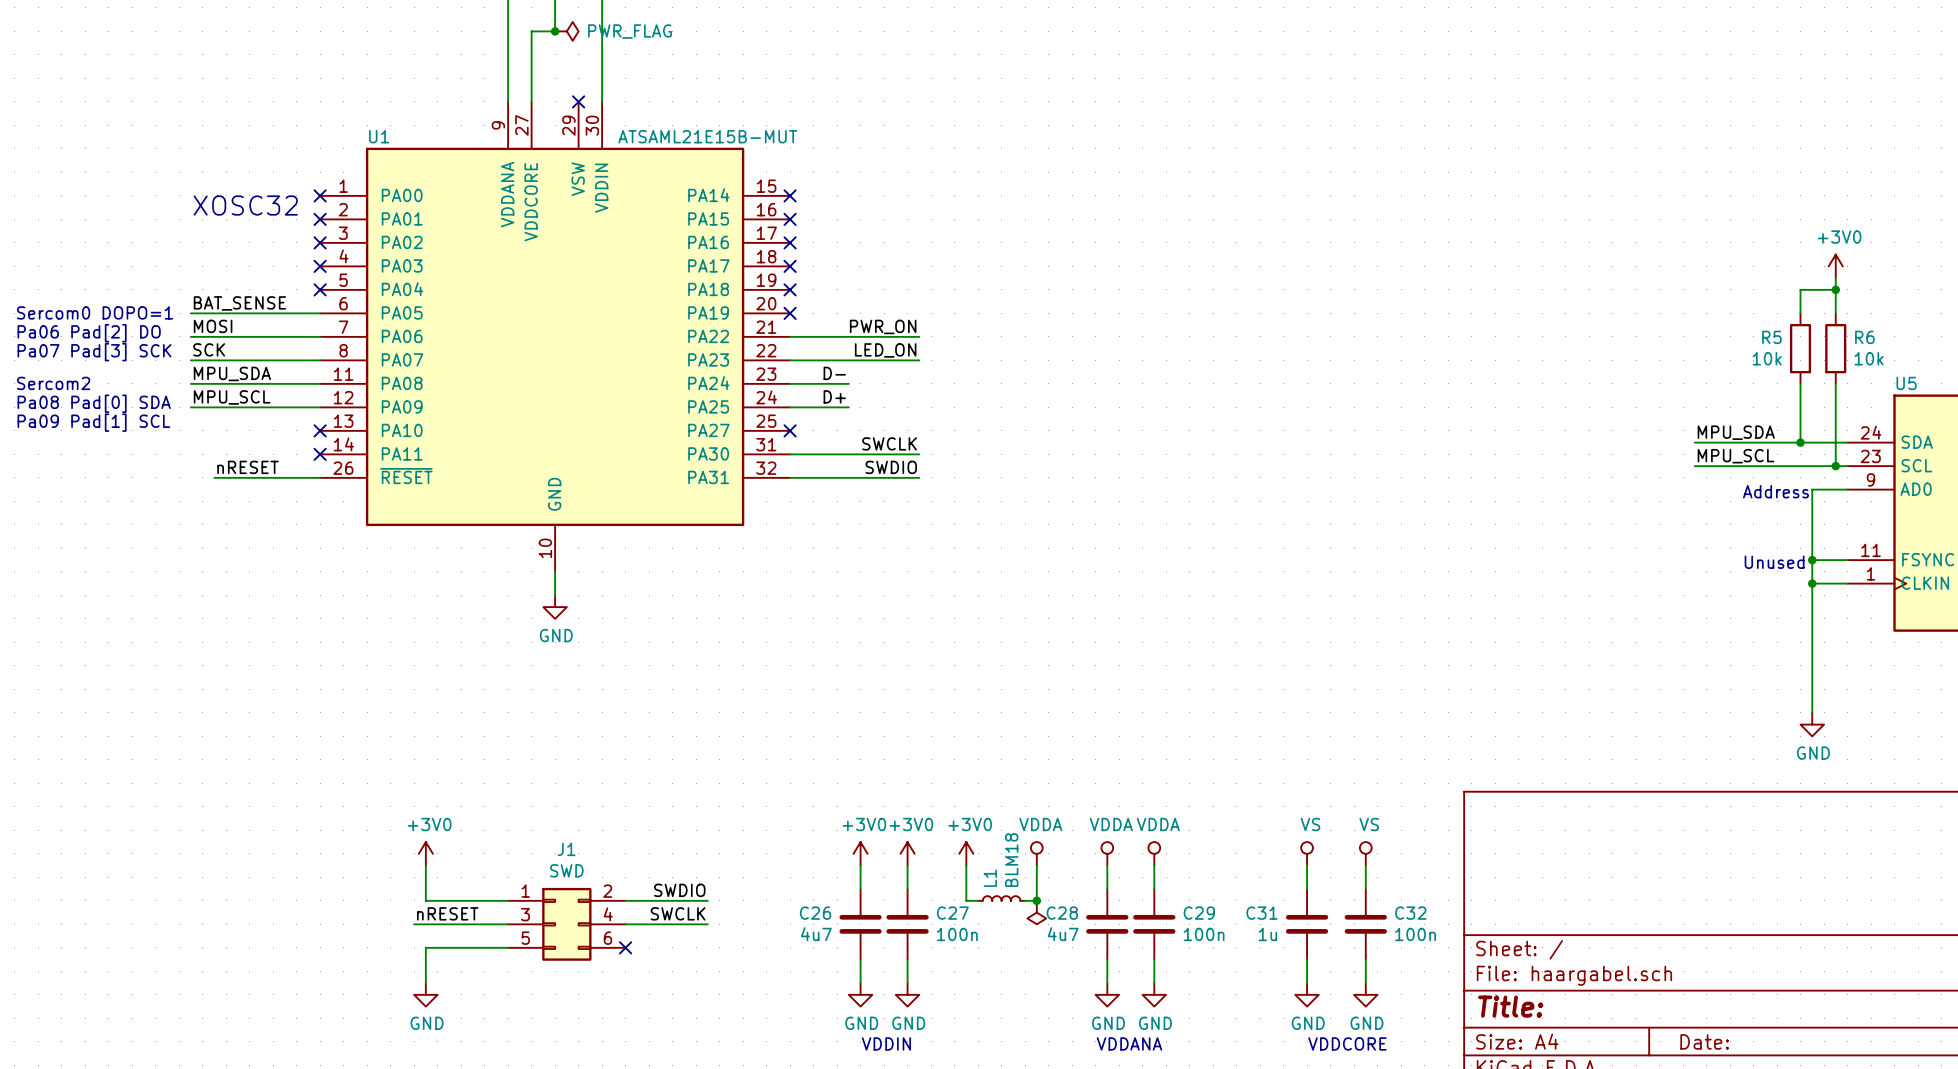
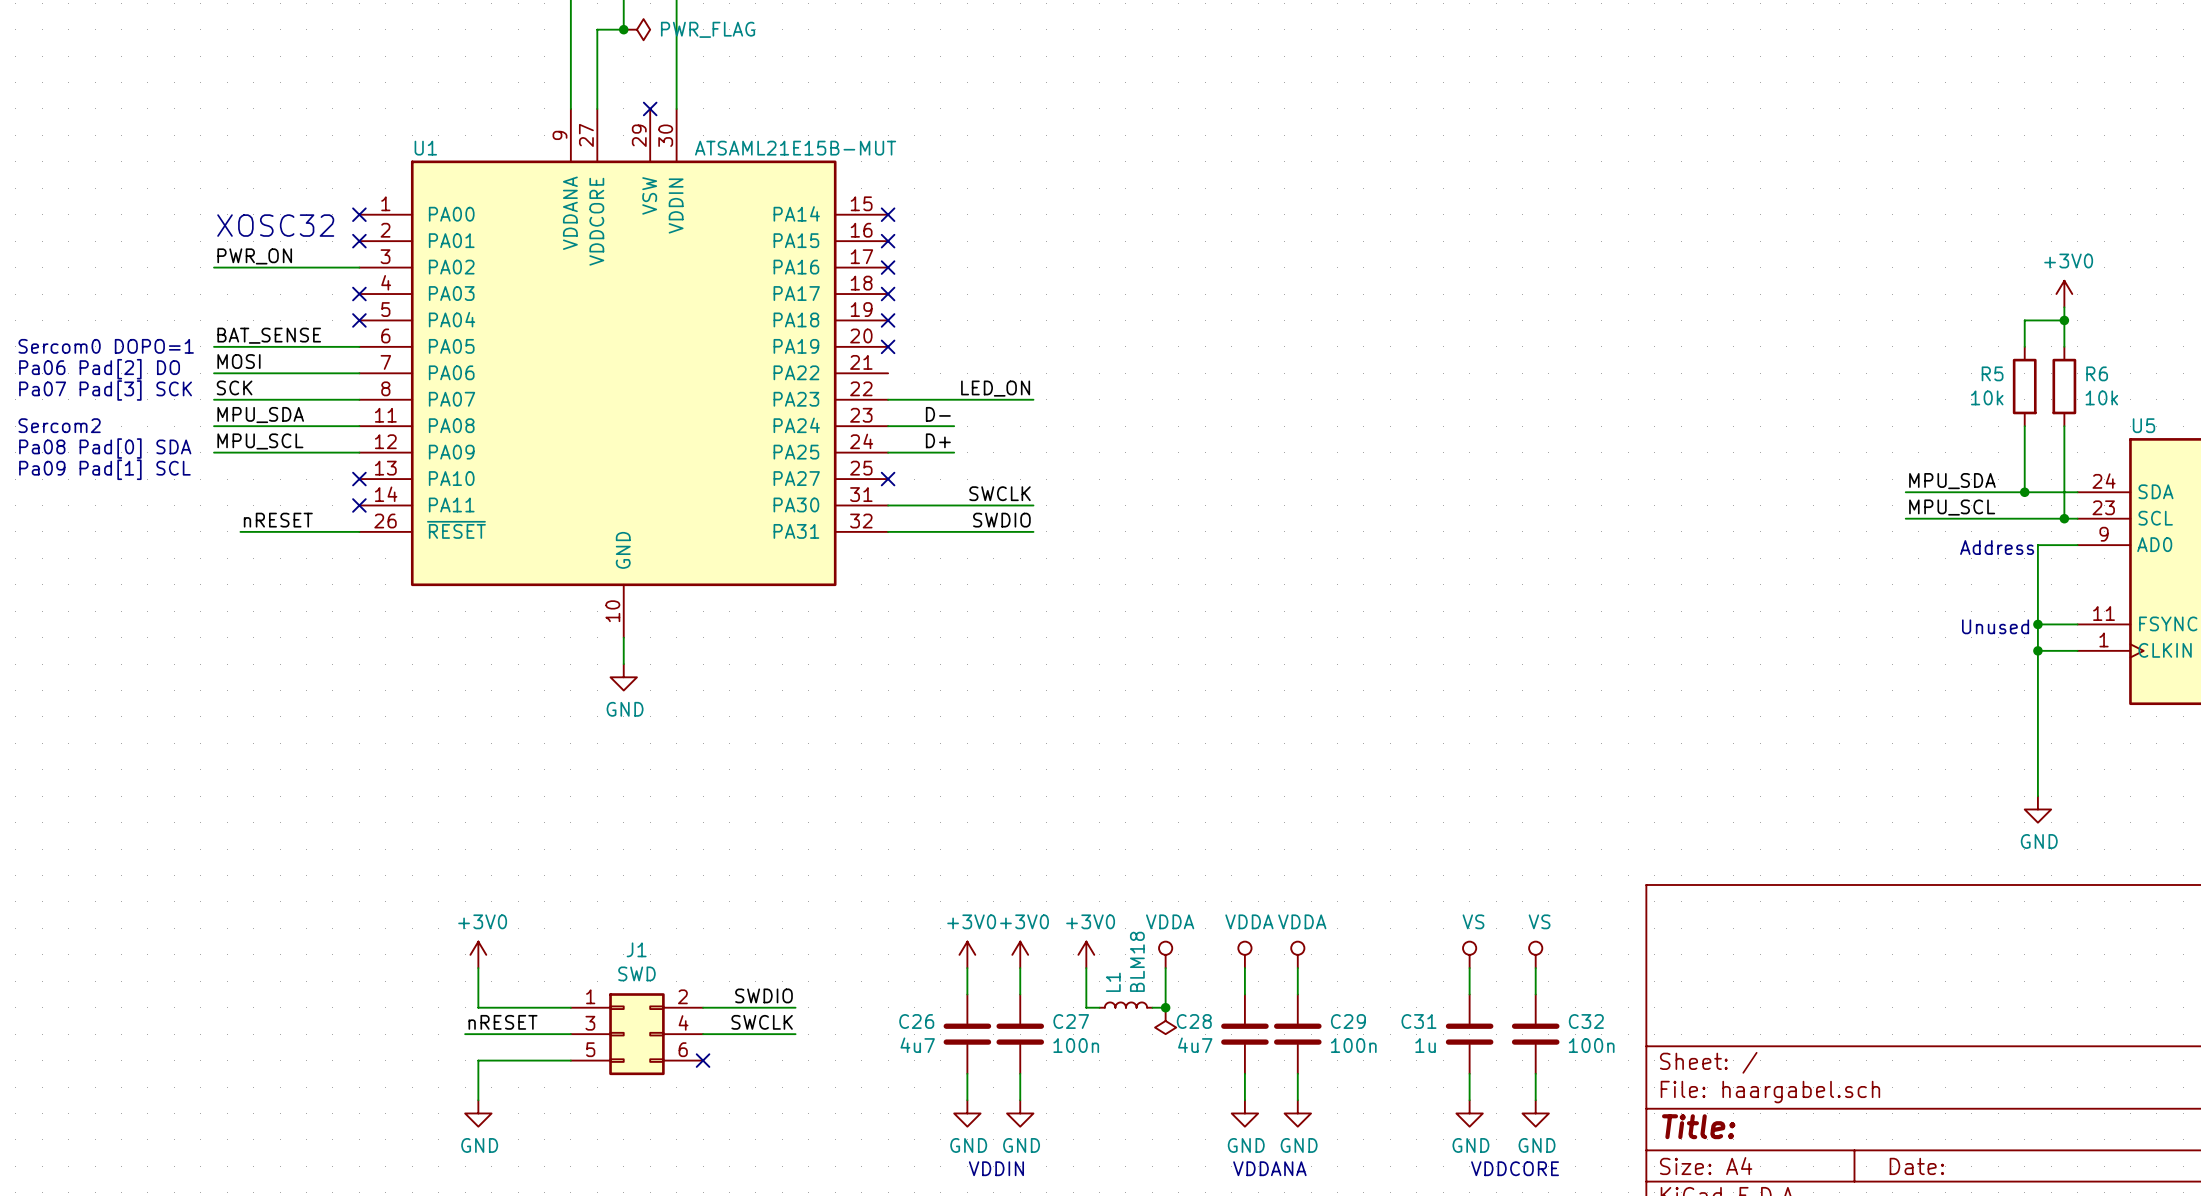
label: none -> PWR_ON (254, 256)
wire: none -> (214, 267) (359, 267)
no-connect mark: (320, 242) -> none
label: PWR_ON (883, 326) -> none
wire: (790, 336) (919, 336) -> none

